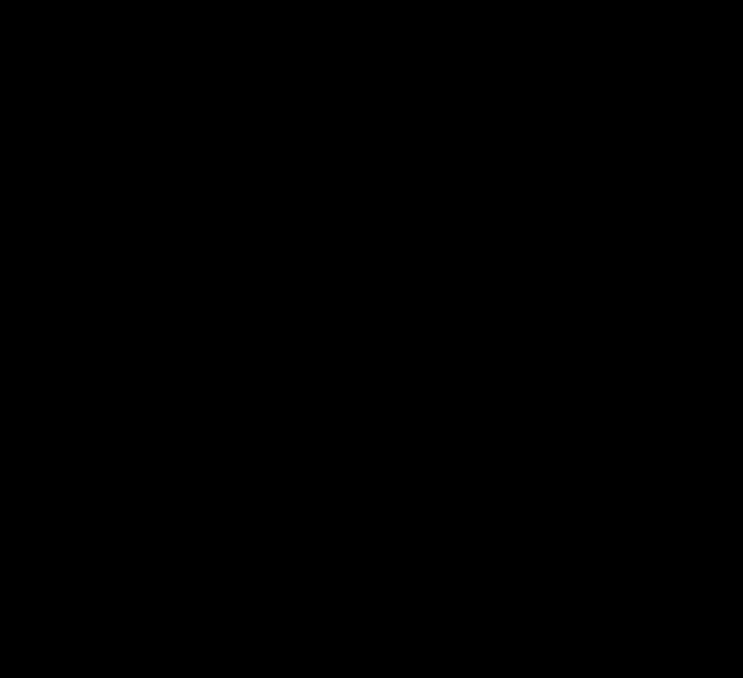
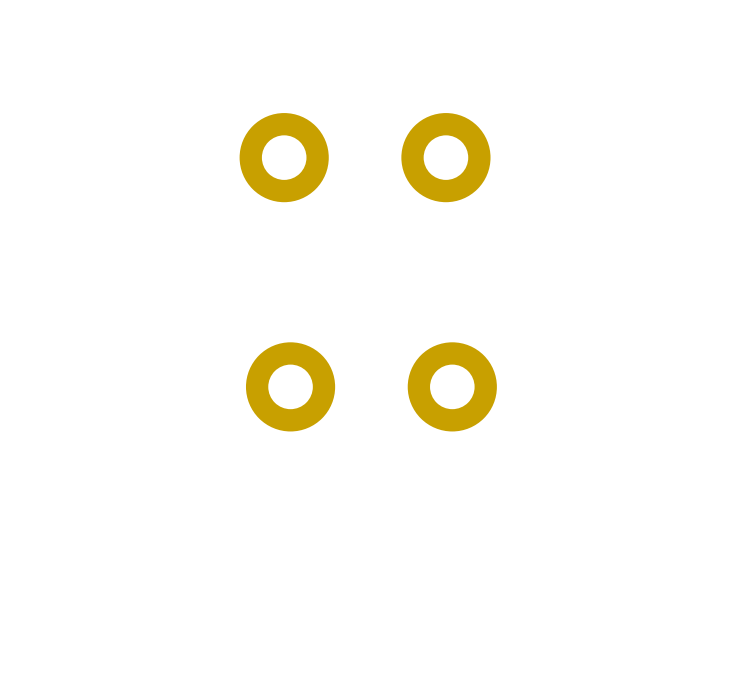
part: none -> (365, 157)
part: none -> (371, 386)

